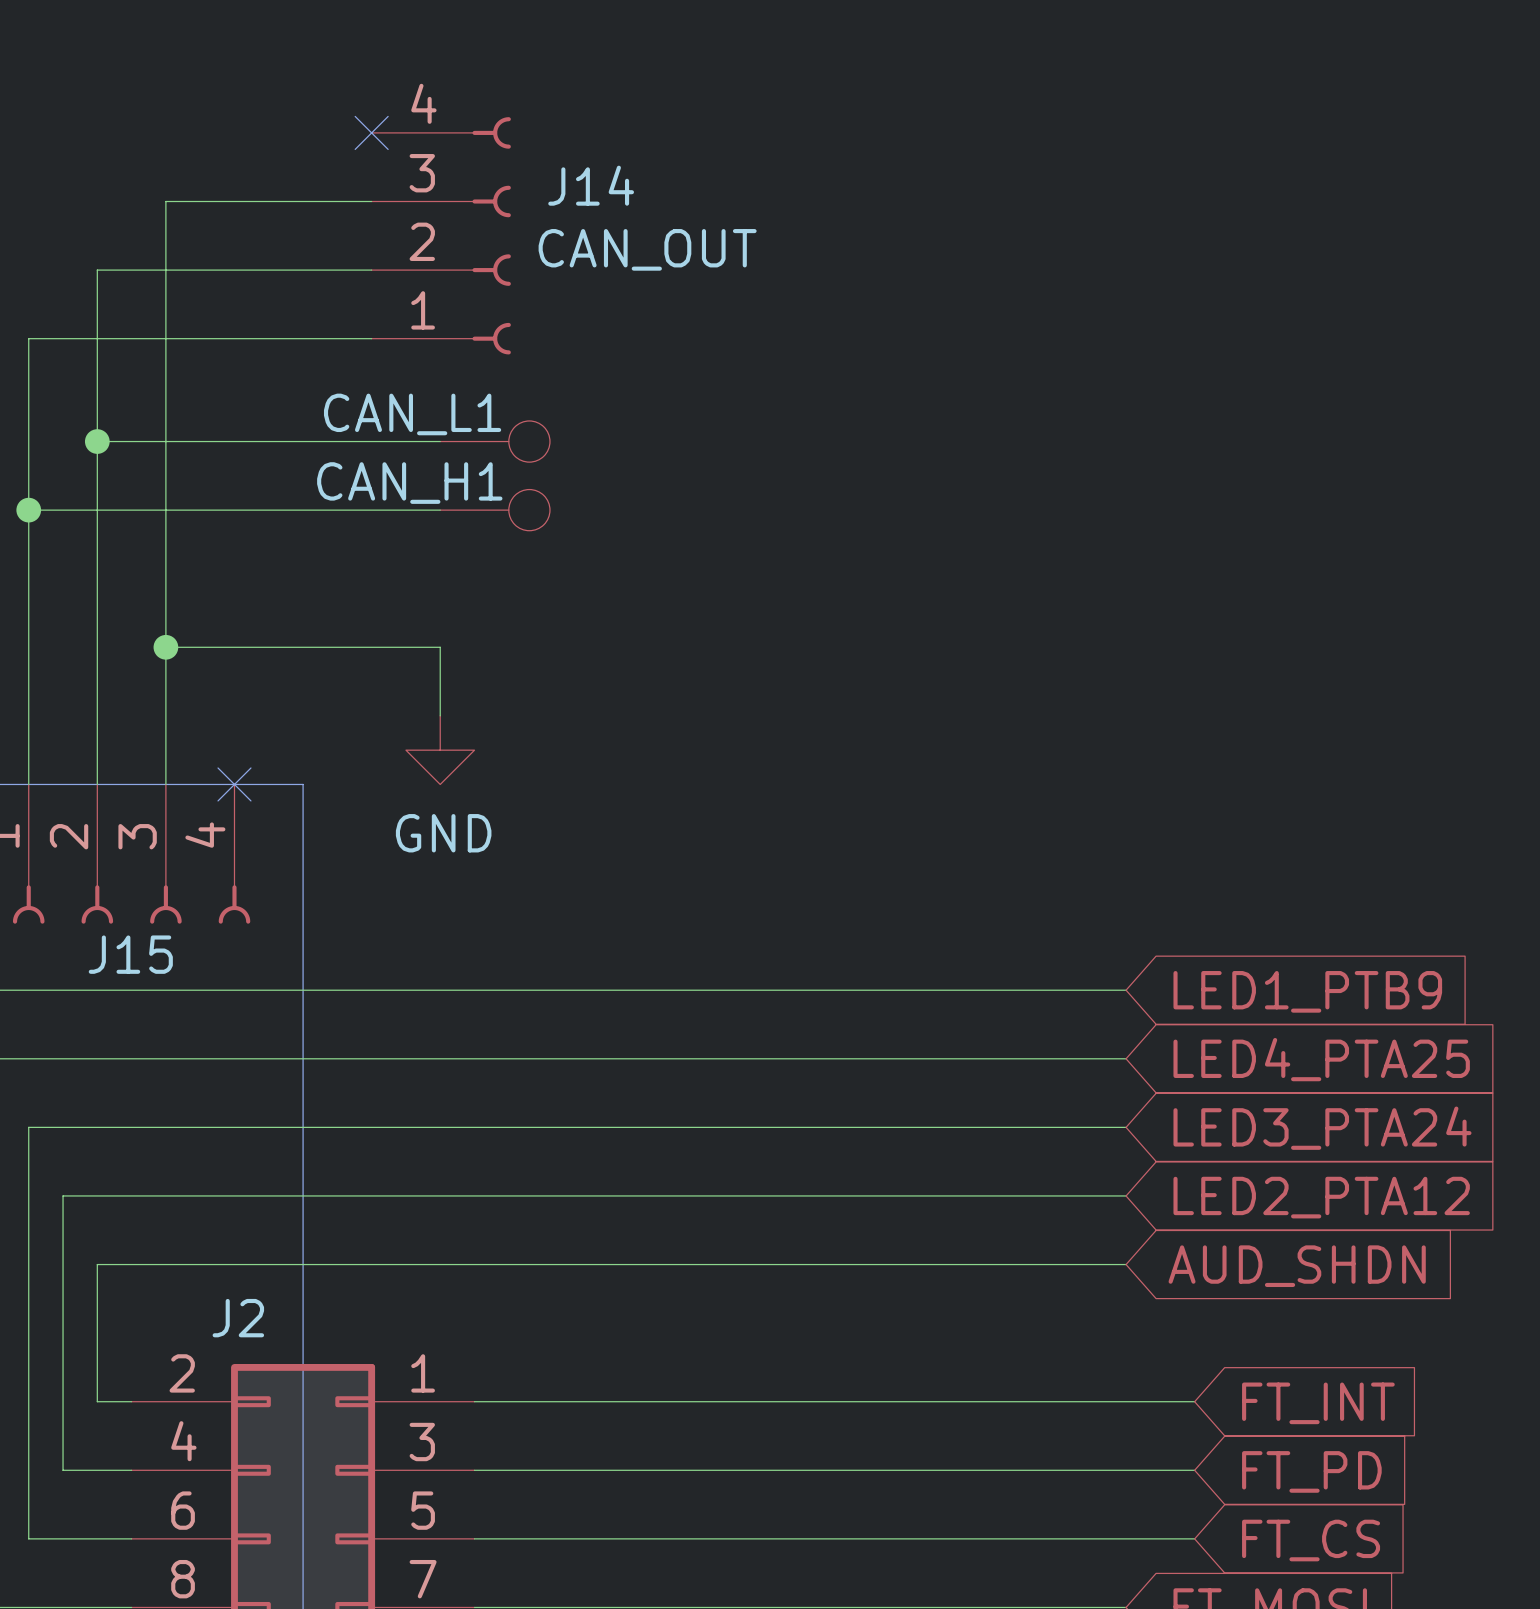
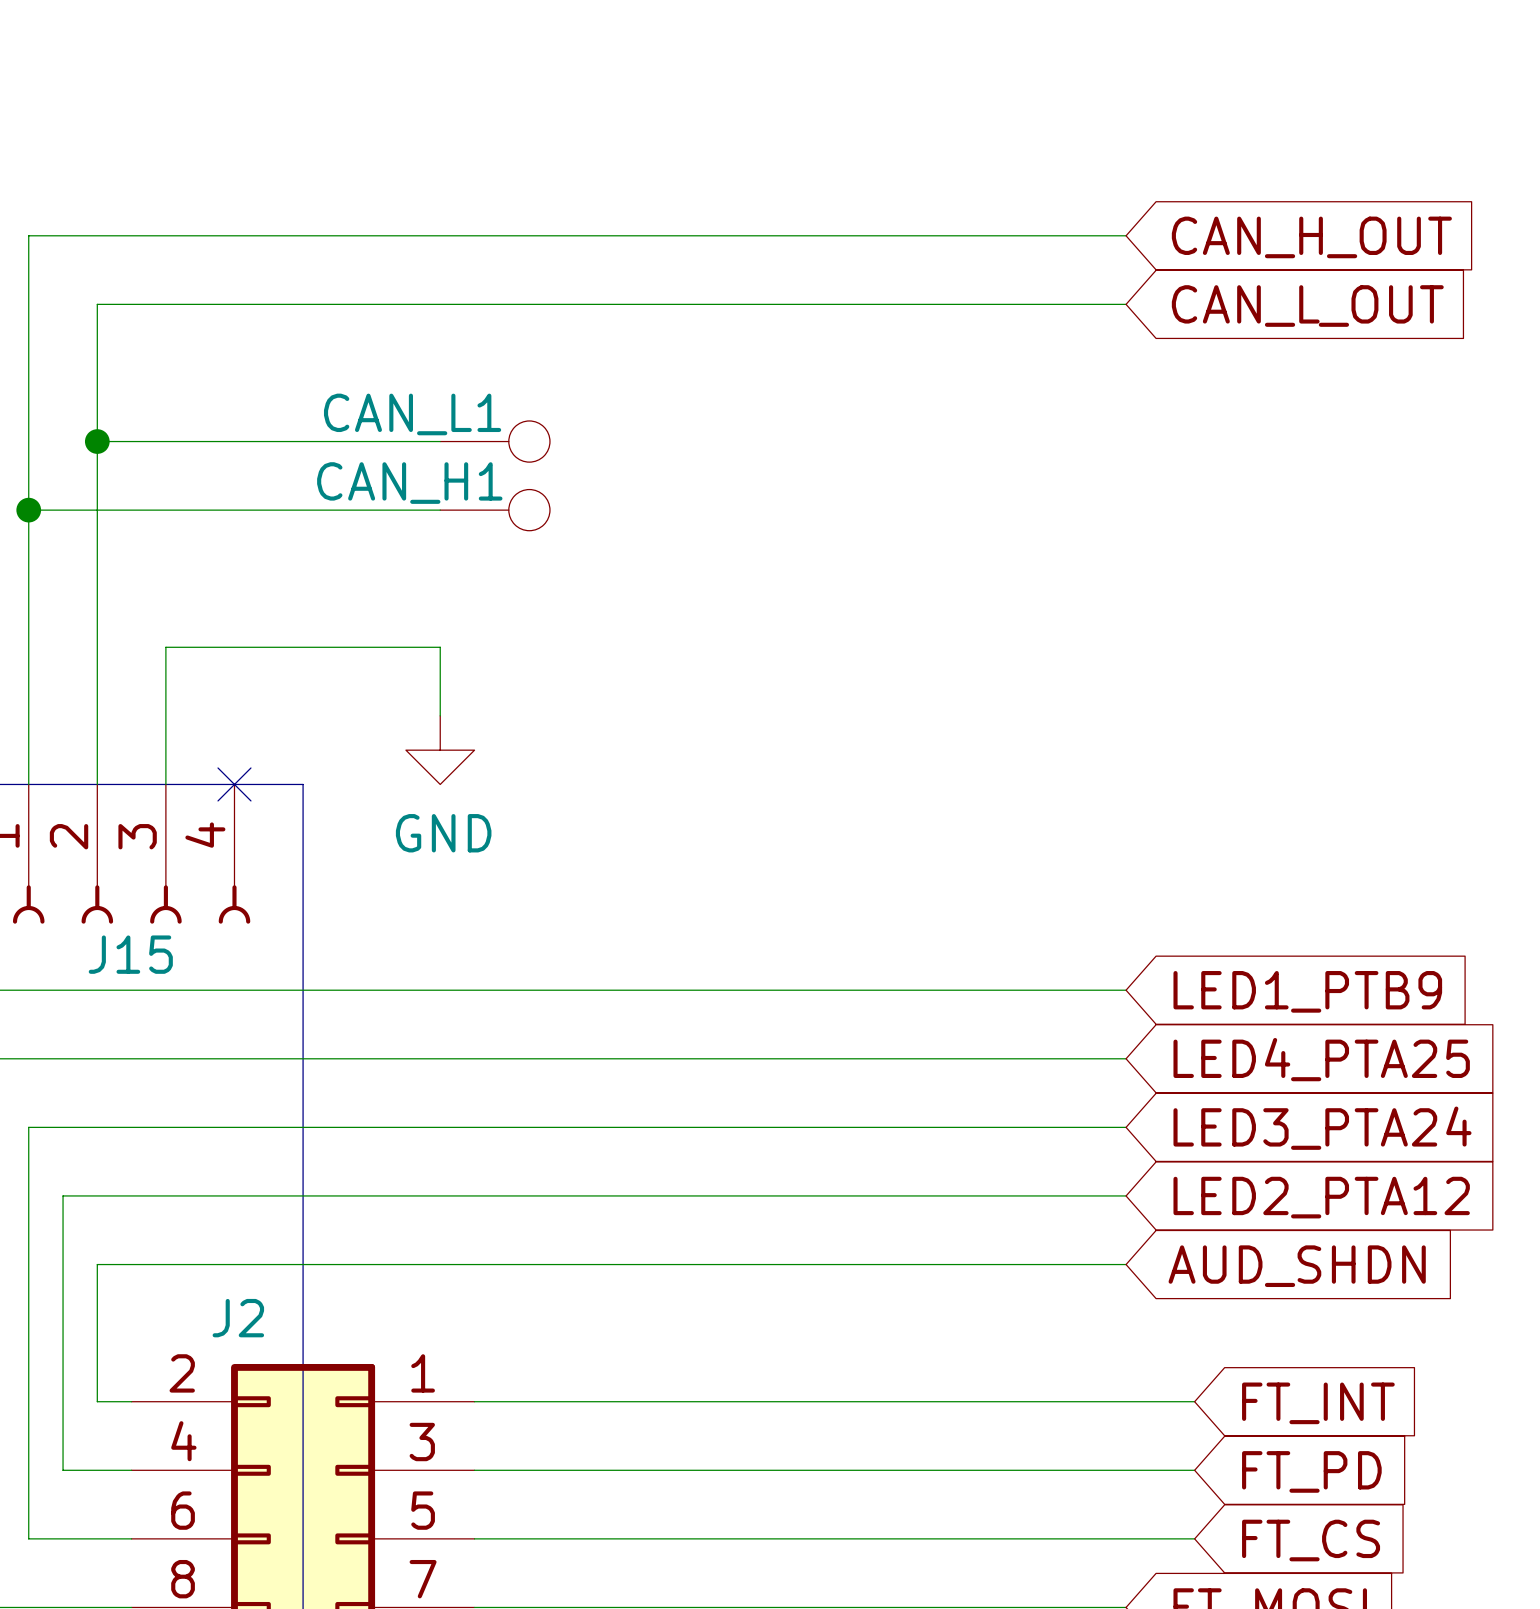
no-connect mark: (371, 132) -> none
wire: (371, 201) (165, 201) (165, 647) -> none
J14: CAN_OUT (441, 235) -> none
global label: none -> CAN_H_OUT (1311, 237)
wire: (371, 270) (97, 270) (97, 304) -> (1126, 304) (97, 304)
global label: none -> CAN_L_OUT (1307, 306)
wire: (28, 338) (371, 338) -> (28, 338) (28, 235) (1126, 235)
junction: (165, 647) -> none

